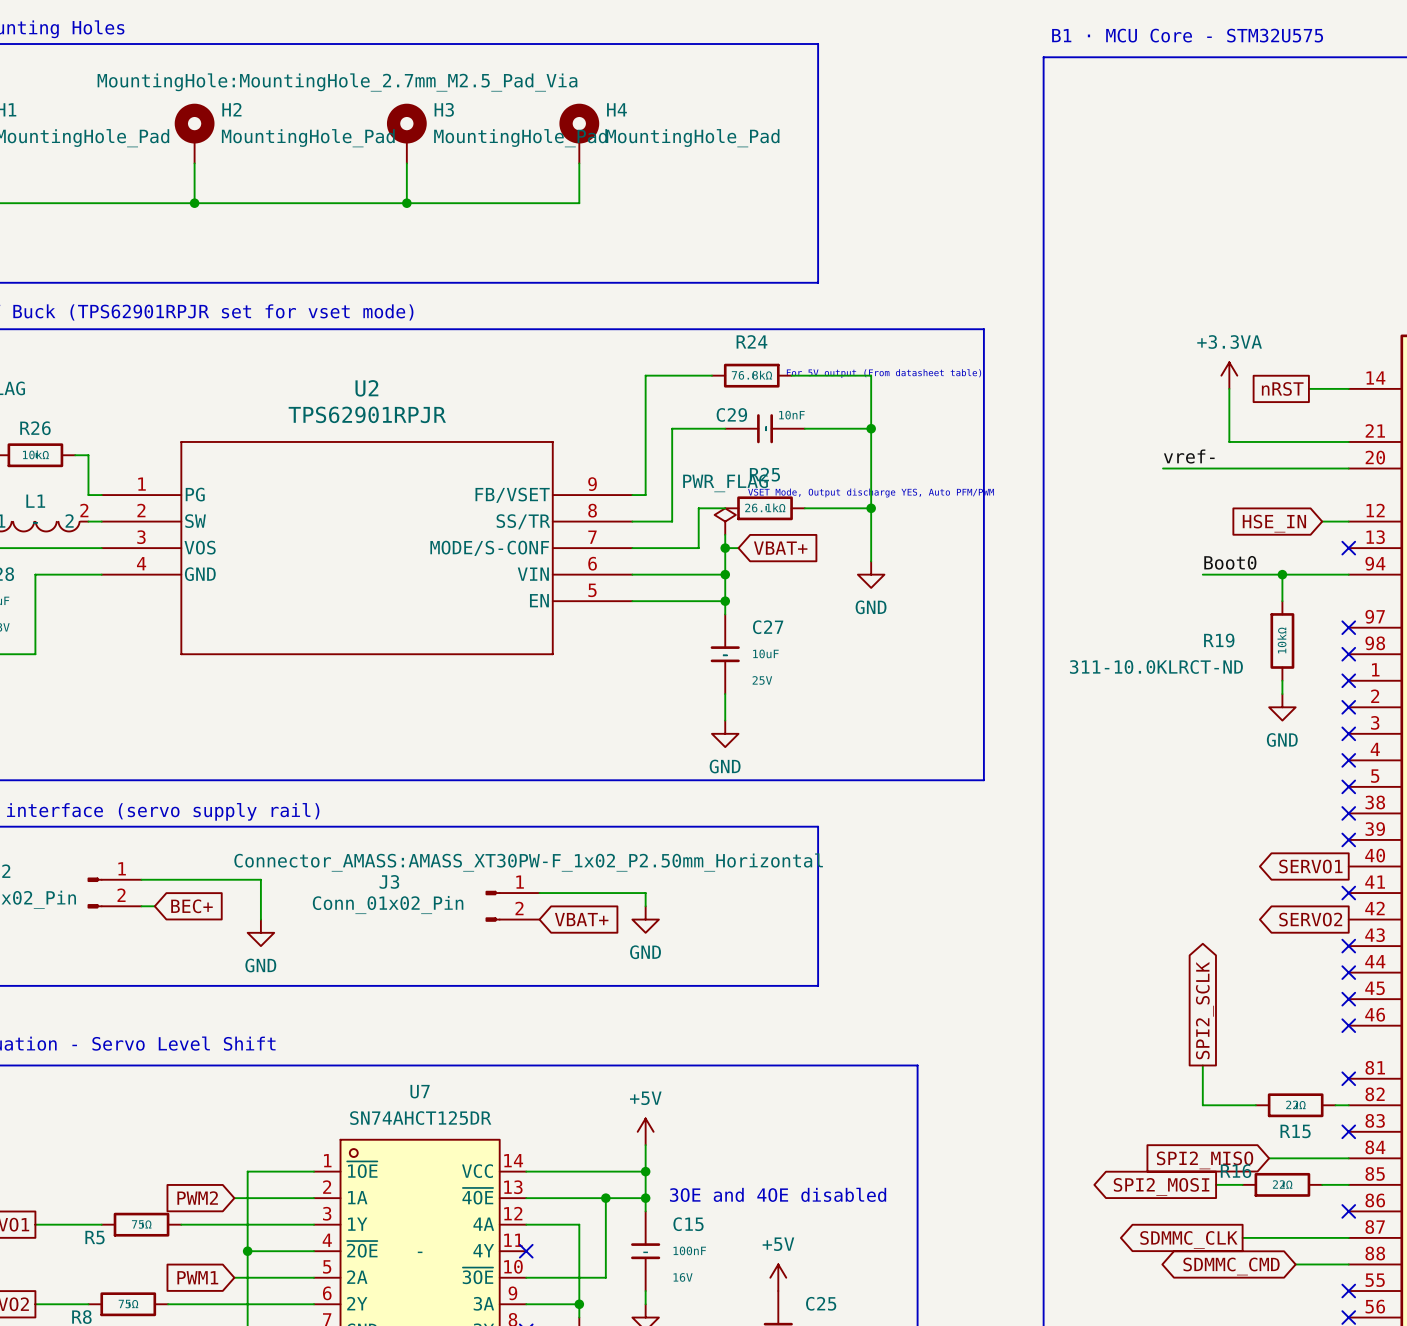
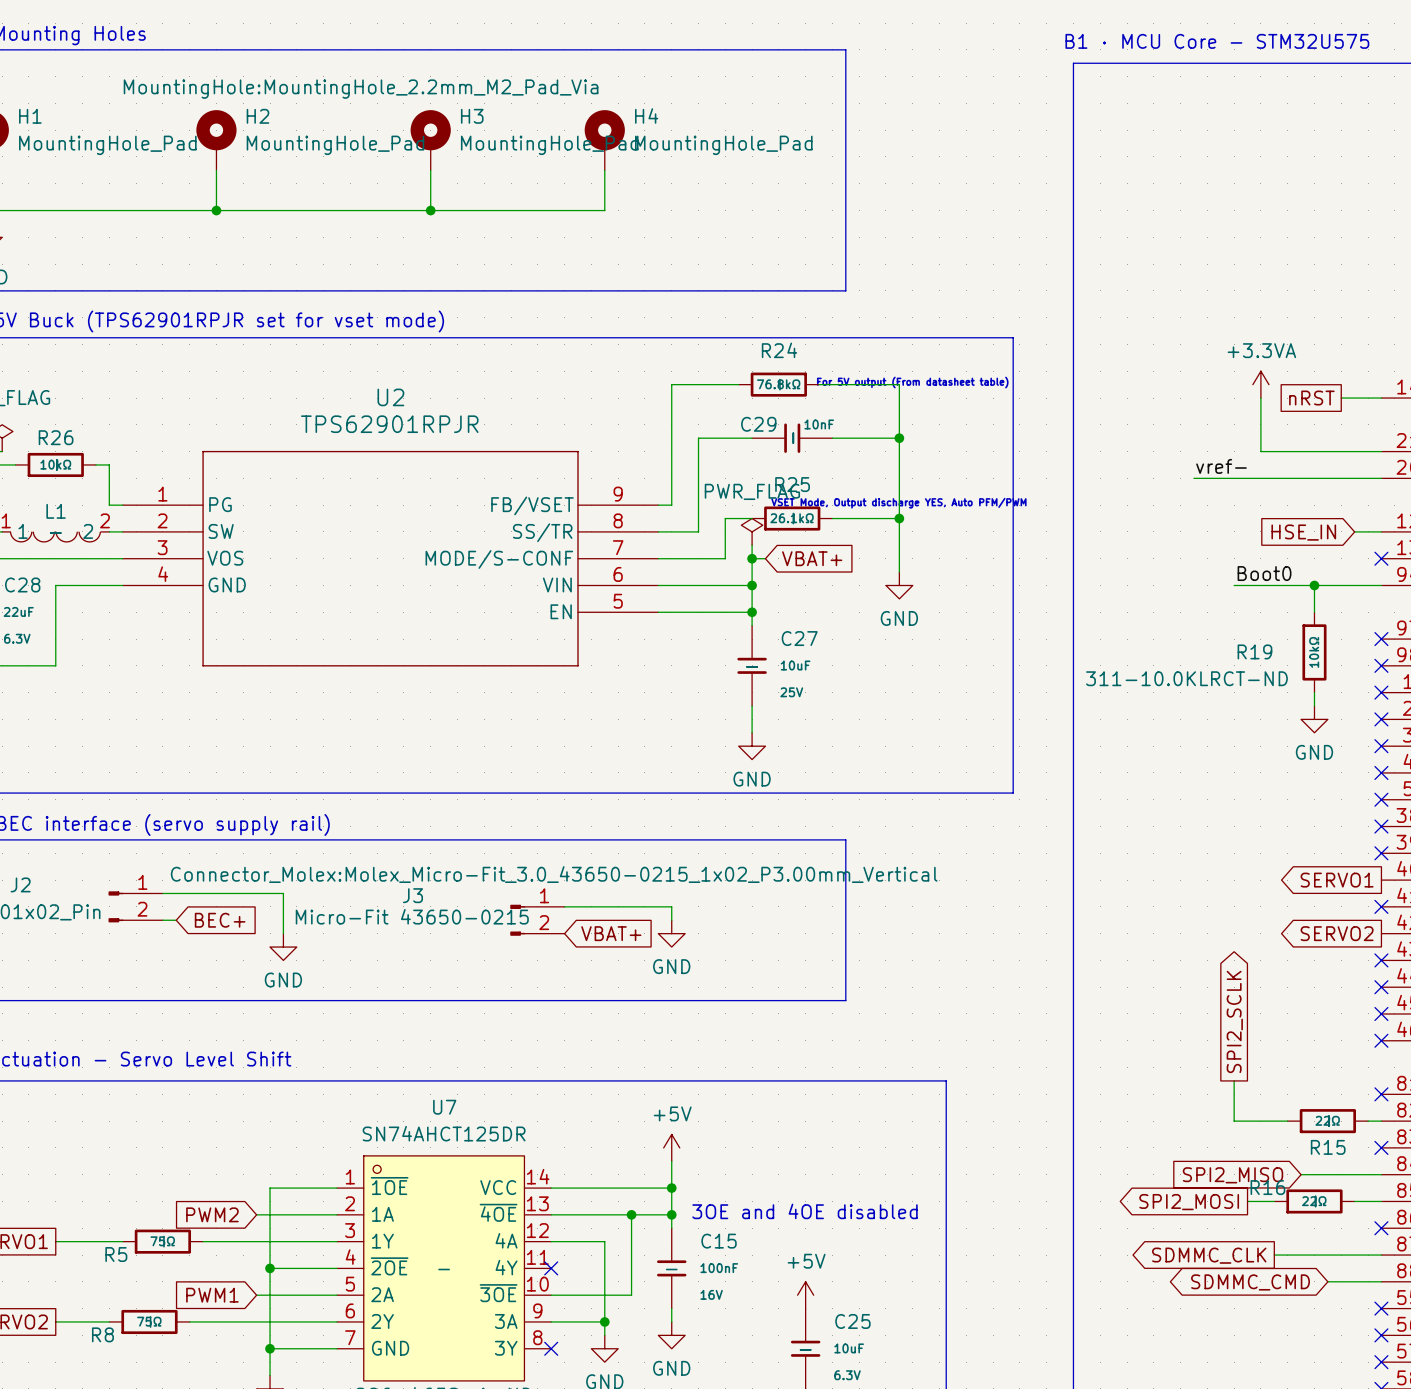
H4 text: MountingHole:MountingHole_2.7mm_M2.5_Pad_Via (337, 82) -> MountingHole:MountingHole_2.2mm_M2_Pad_Via (361, 89)
J3 text: Connector_AMASS:AMASS_XT30PW-F_1x02_P2.50mm_Horizontal (528, 862) -> Connector_Molex:Molex_Micro-Fit_3.0_43650-0215_1x02_P3.00mm_Vertical (554, 874)
J3 value: Conn_01x02_Pin (388, 905) -> Micro-Fit 43650-0215 (412, 916)

